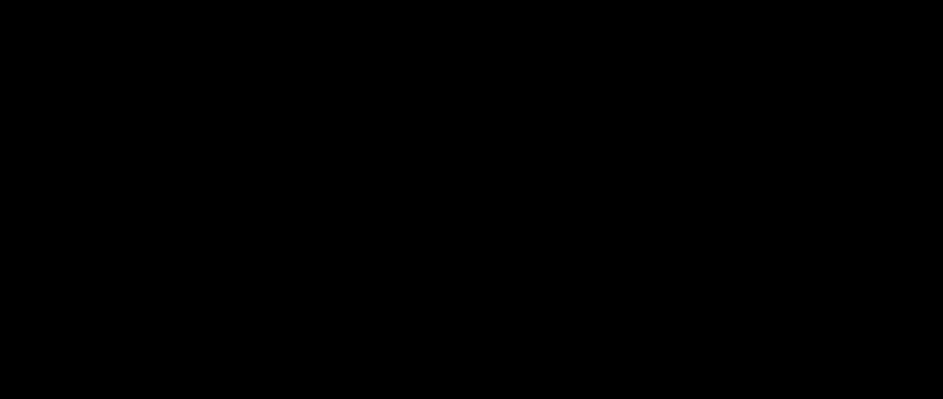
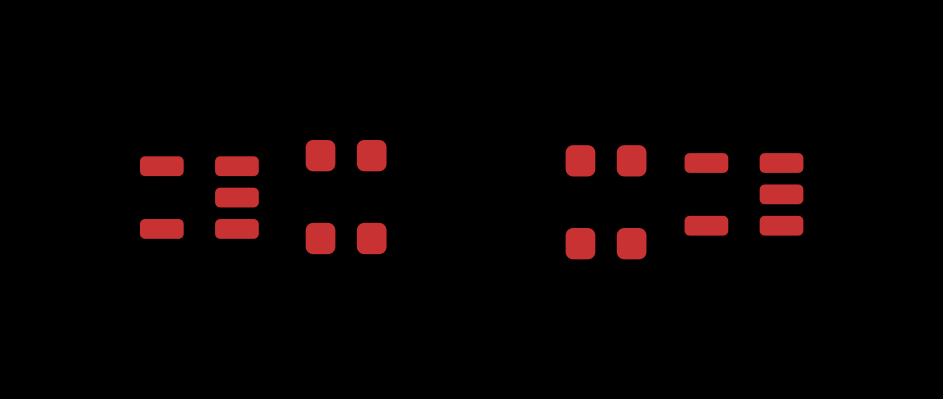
part: none -> (346, 155)
part: none -> (606, 160)
part: none -> (743, 194)
part: none -> (199, 197)
part: none -> (346, 238)
part: none -> (606, 243)

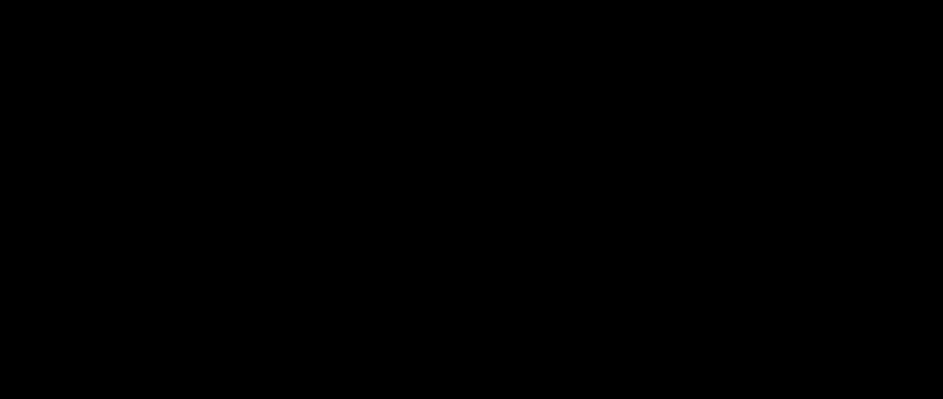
part: (346, 155) -> none
part: (606, 160) -> none
part: (743, 194) -> none
part: (199, 197) -> none
part: (346, 238) -> none
part: (606, 243) -> none

